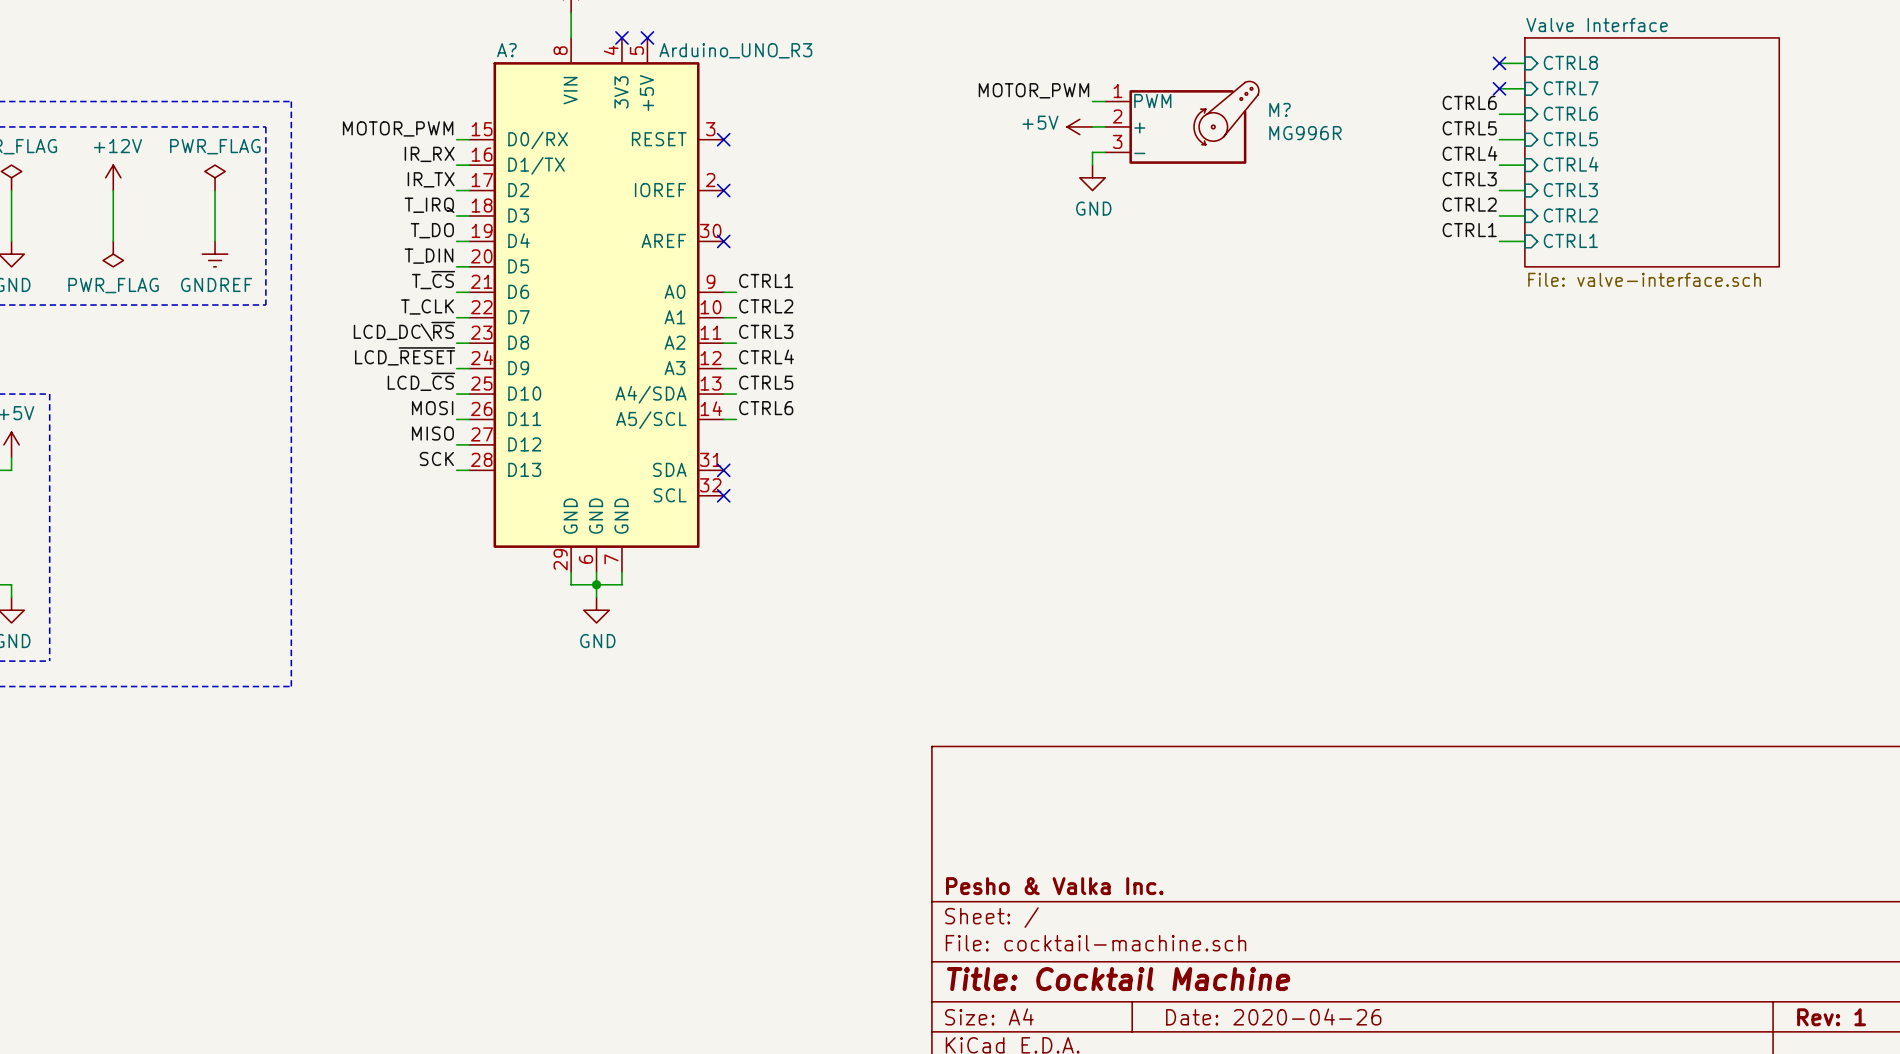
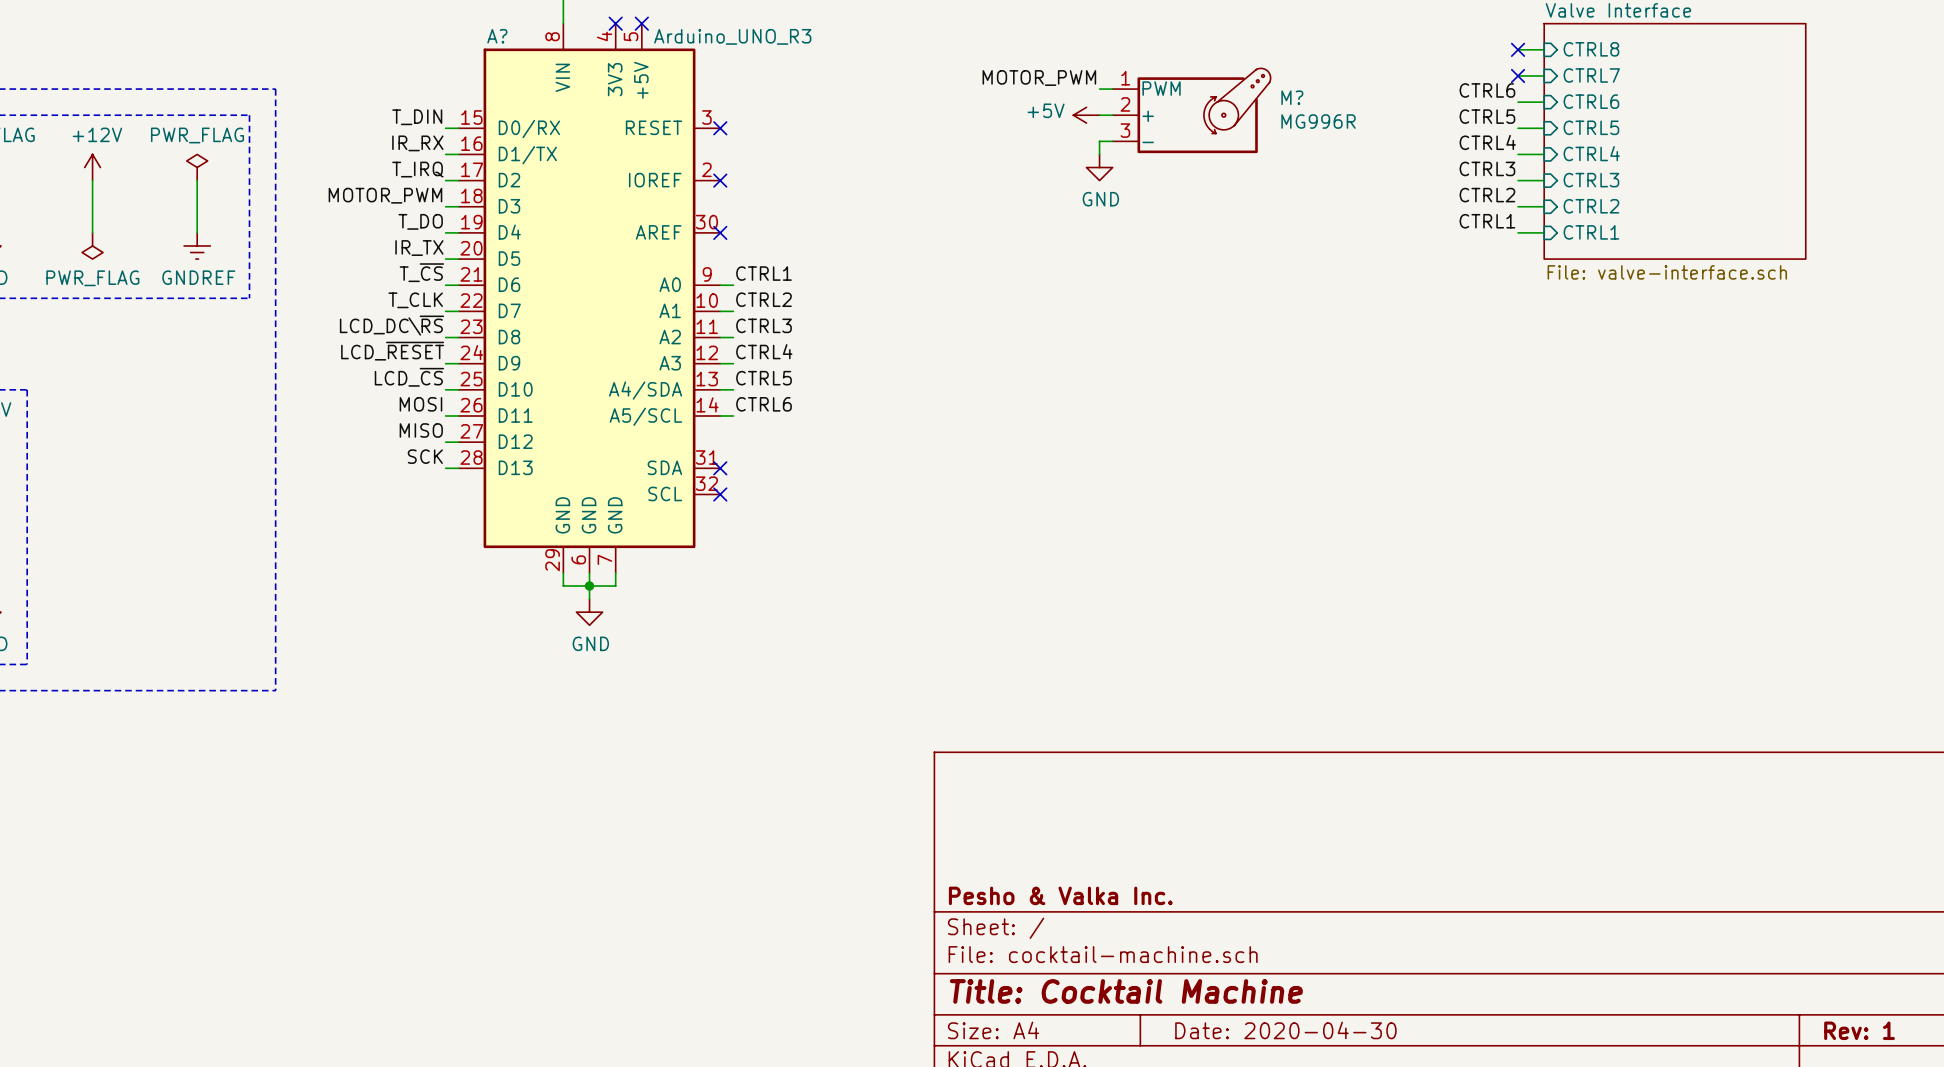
label: MOTOR_PWM (398, 128) -> T_DIN (417, 117)
label: IR_TX (431, 179) -> T_IRQ (417, 169)
label: T_IRQ (429, 205) -> MOTOR_PWM (385, 195)
label: T_DIN (429, 256) -> IR_TX (419, 248)
title block: Date: 2020-04-26 (1273, 1016) -> Date: 2020-04-30 (1285, 1030)

